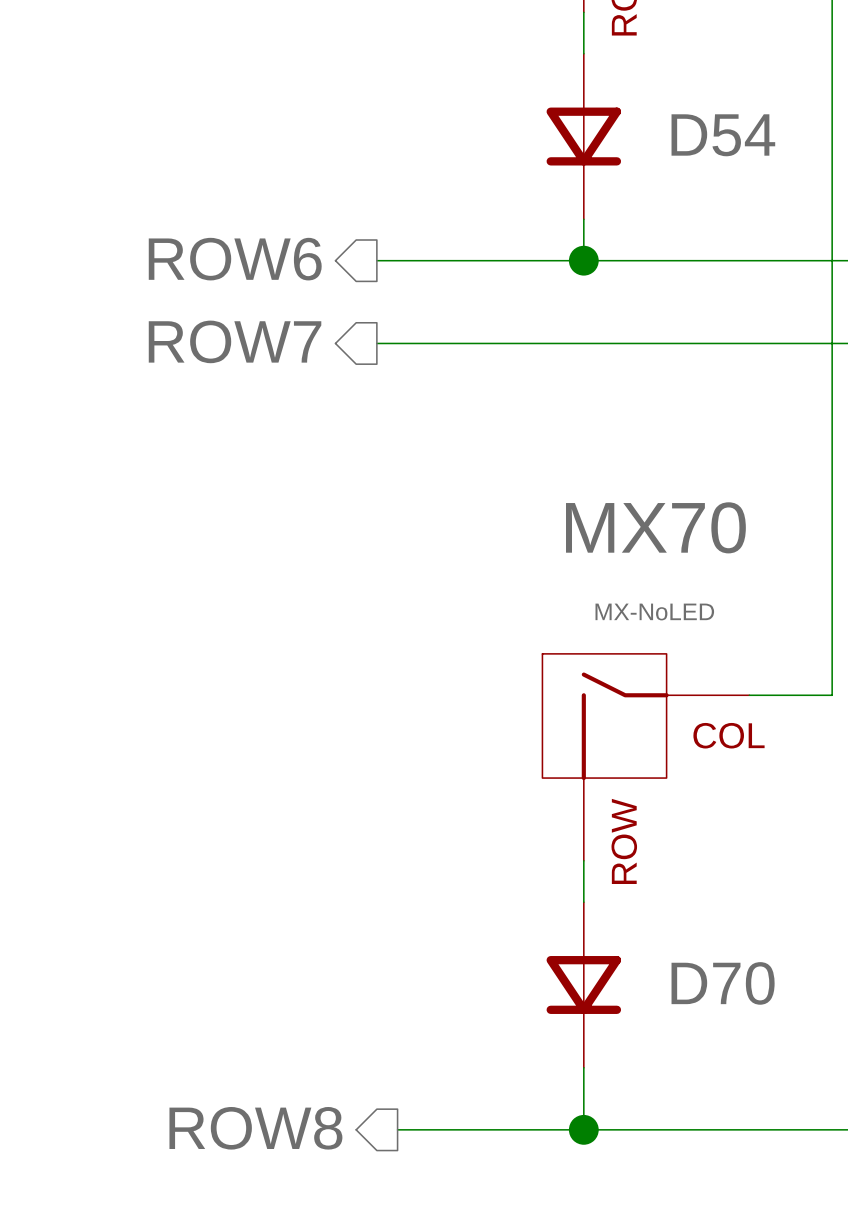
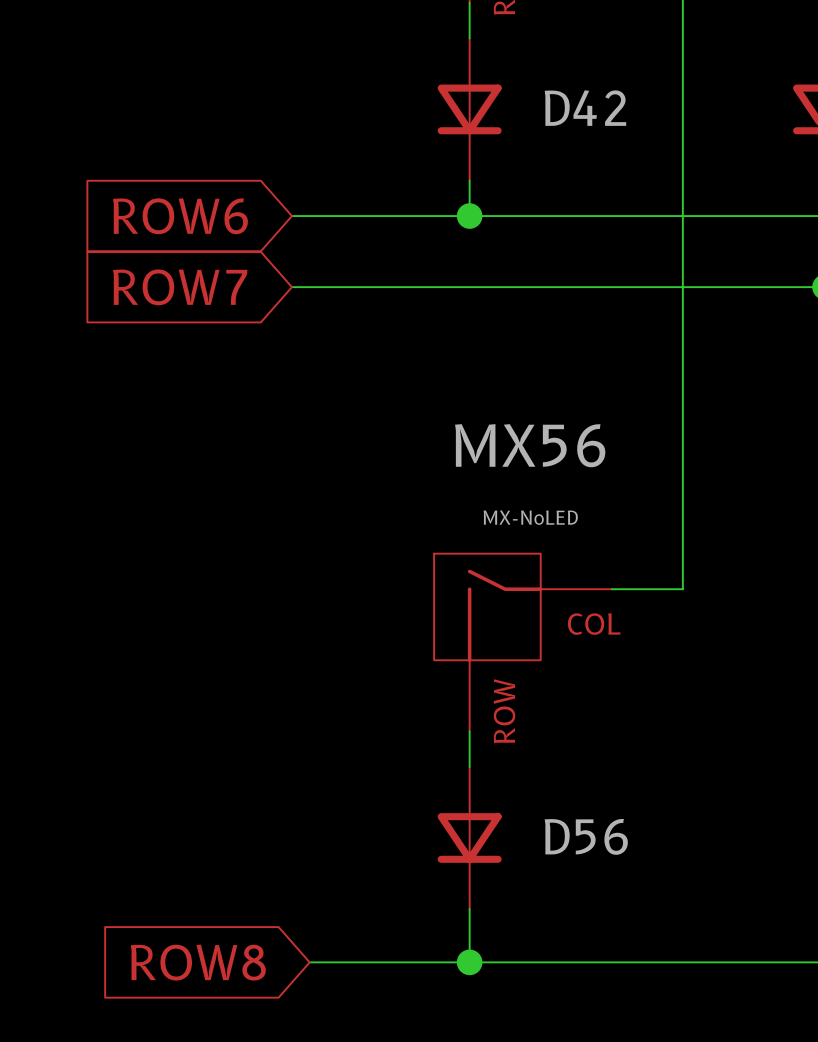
D54 name: D54 (723, 135) -> D42 (585, 108)
hierarchical label: ROW6 (235, 259) -> none
global label: none -> ROW6 (180, 216)
hierarchical label: ROW7 (235, 341) -> none
global label: none -> ROW7 (180, 287)
MX70 name: MX70 (655, 527) -> MX56 (530, 445)
D70 name: D70 (723, 983) -> D56 (586, 836)
hierarchical label: ROW8 (255, 1128) -> none
global label: none -> ROW8 (198, 962)

